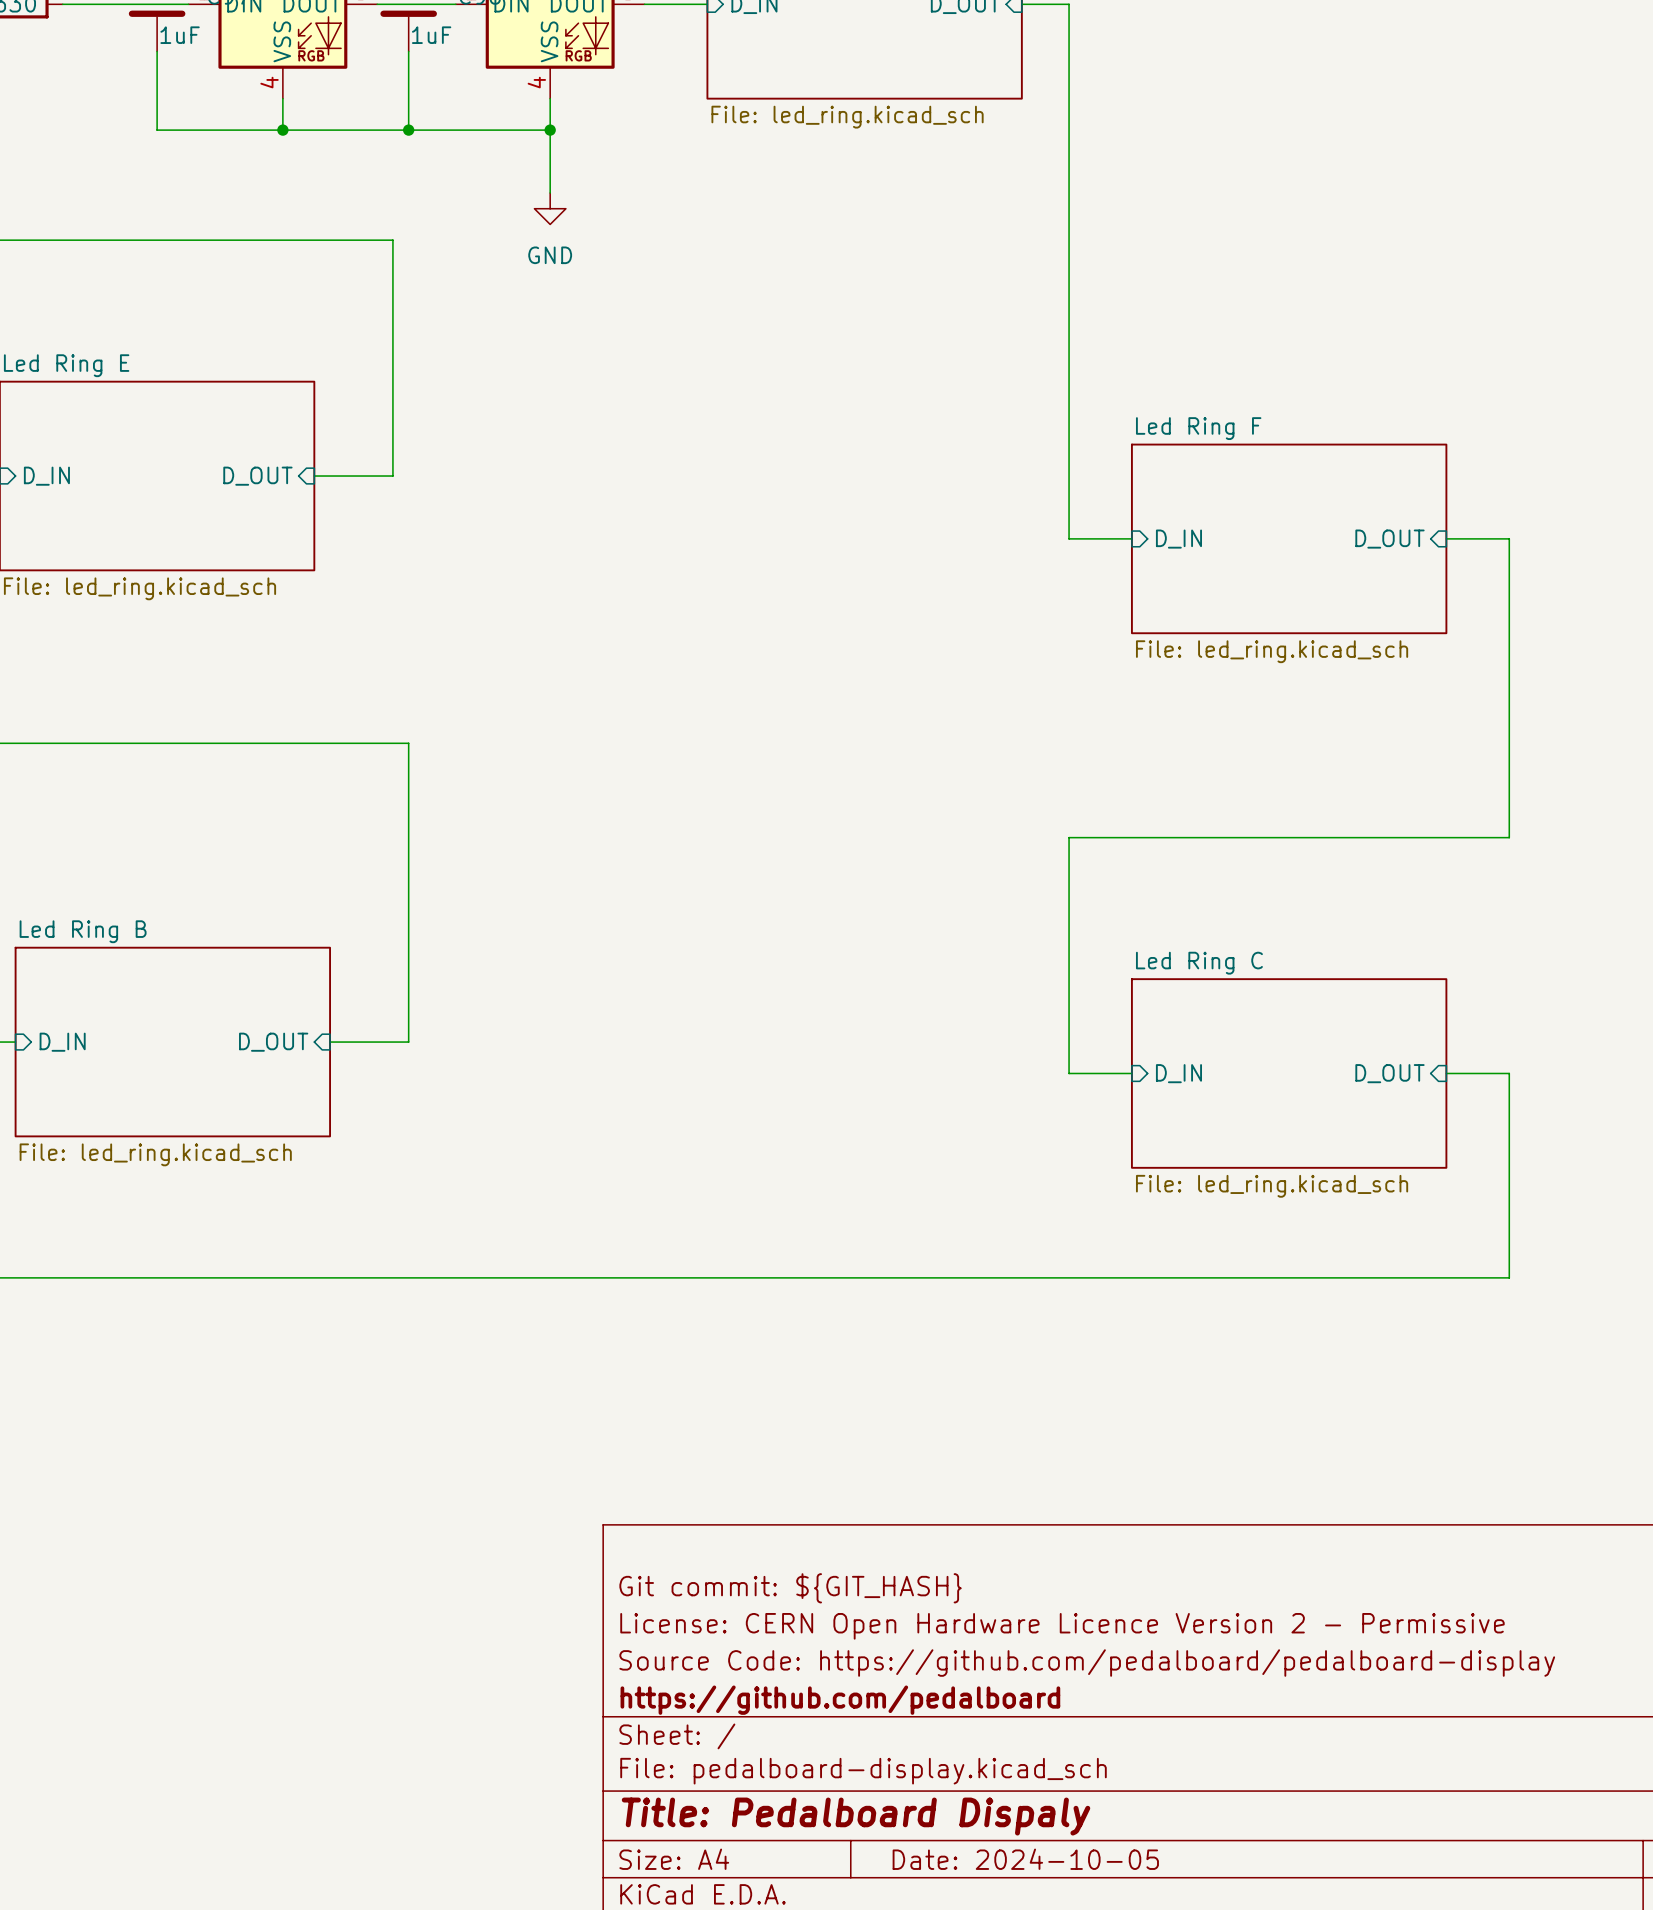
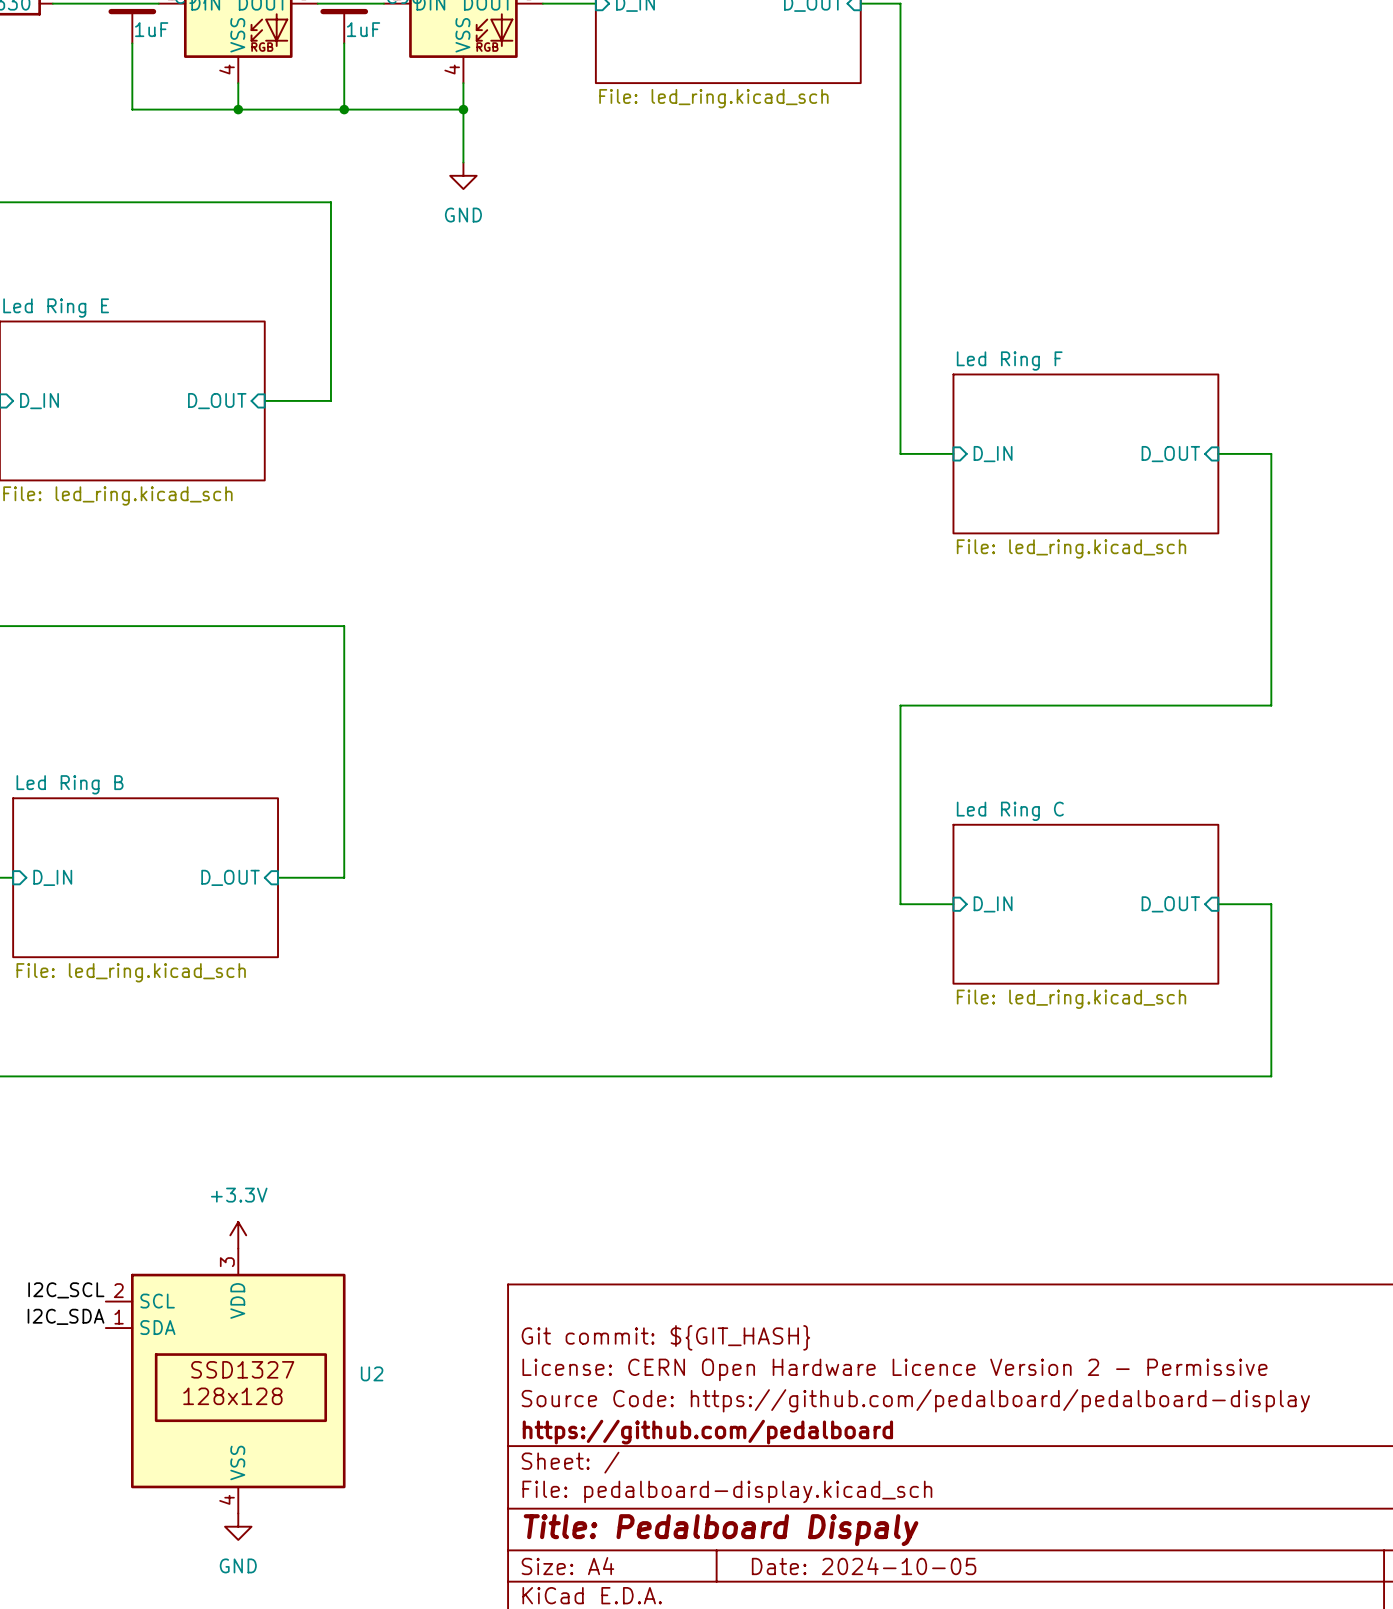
power symbol: none -> +3.3V (238, 1235)
label: none -> I2C_SCL (66, 1290)
label: none -> I2C_SDA (66, 1316)
U2: none -> (225, 1381)
power symbol: none -> GND (238, 1526)

